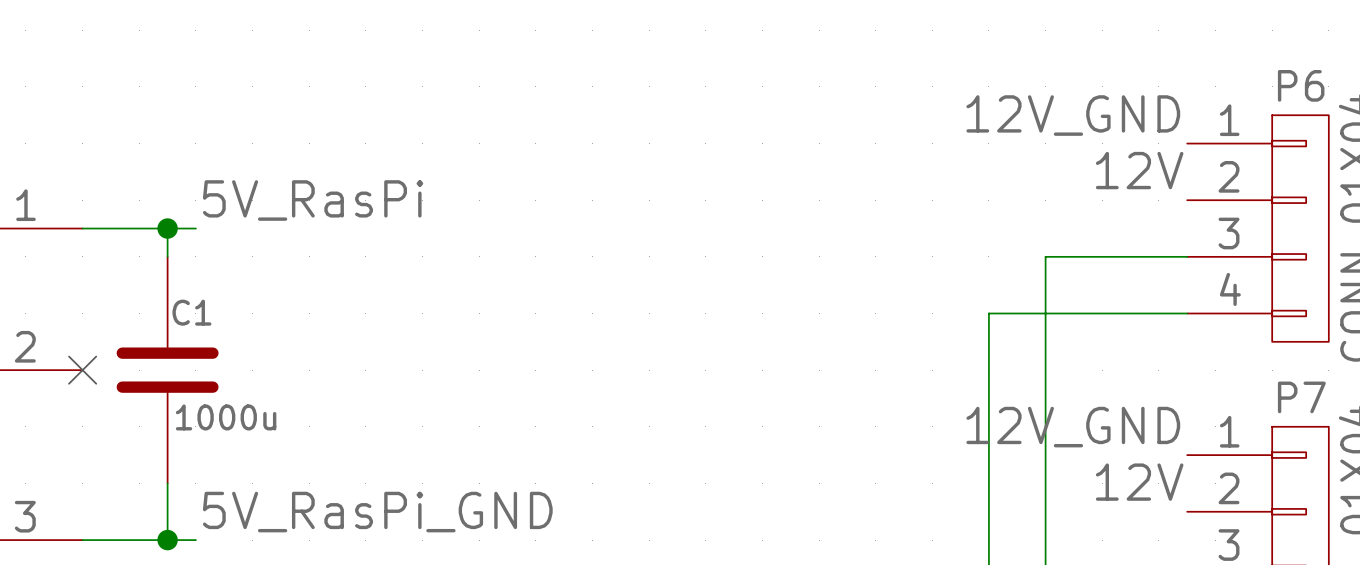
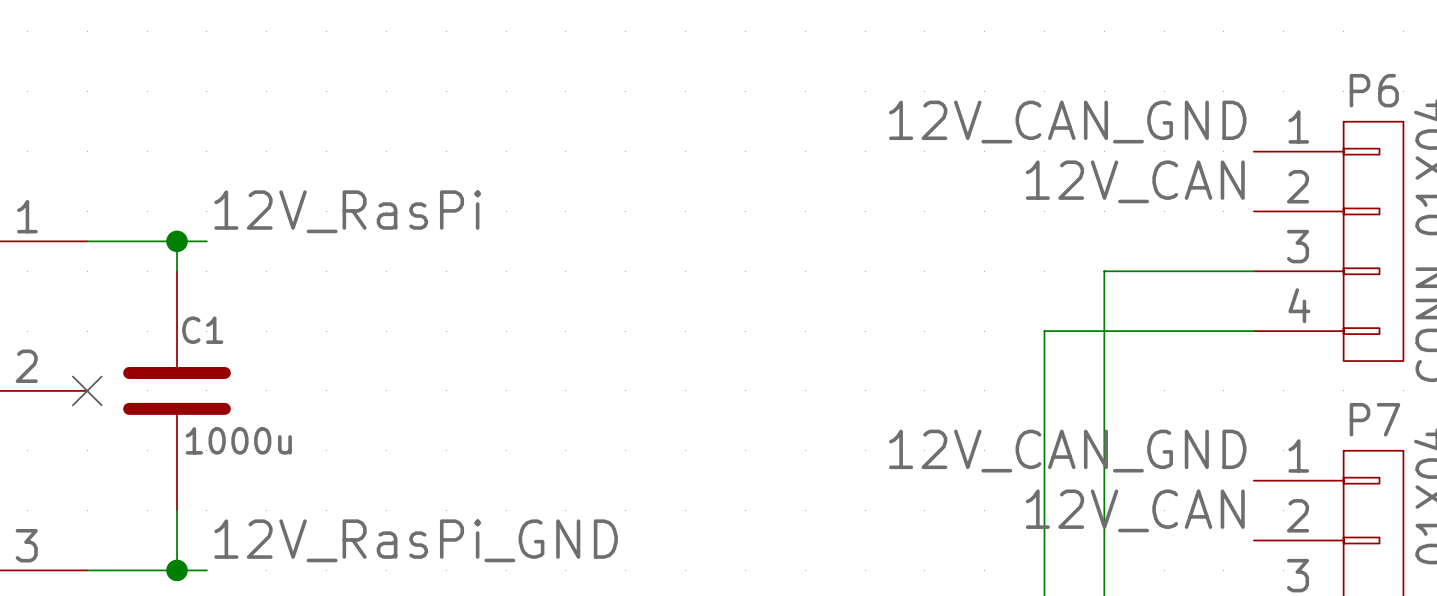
label: 12V_GND (1073, 115) -> 12V_CAN_GND (1067, 122)
label: 12V (1139, 170) -> 12V_CAN (1135, 181)
label: 5V_RasPi (313, 200) -> 12V_RasPi (347, 211)
label: 12V_GND (1073, 427) -> 12V_CAN_GND (1067, 451)
label: 12V (1139, 482) -> 12V_CAN (1135, 510)
label: 5V_RasPi_GND (377, 512) -> 12V_RasPi_GND (416, 540)

